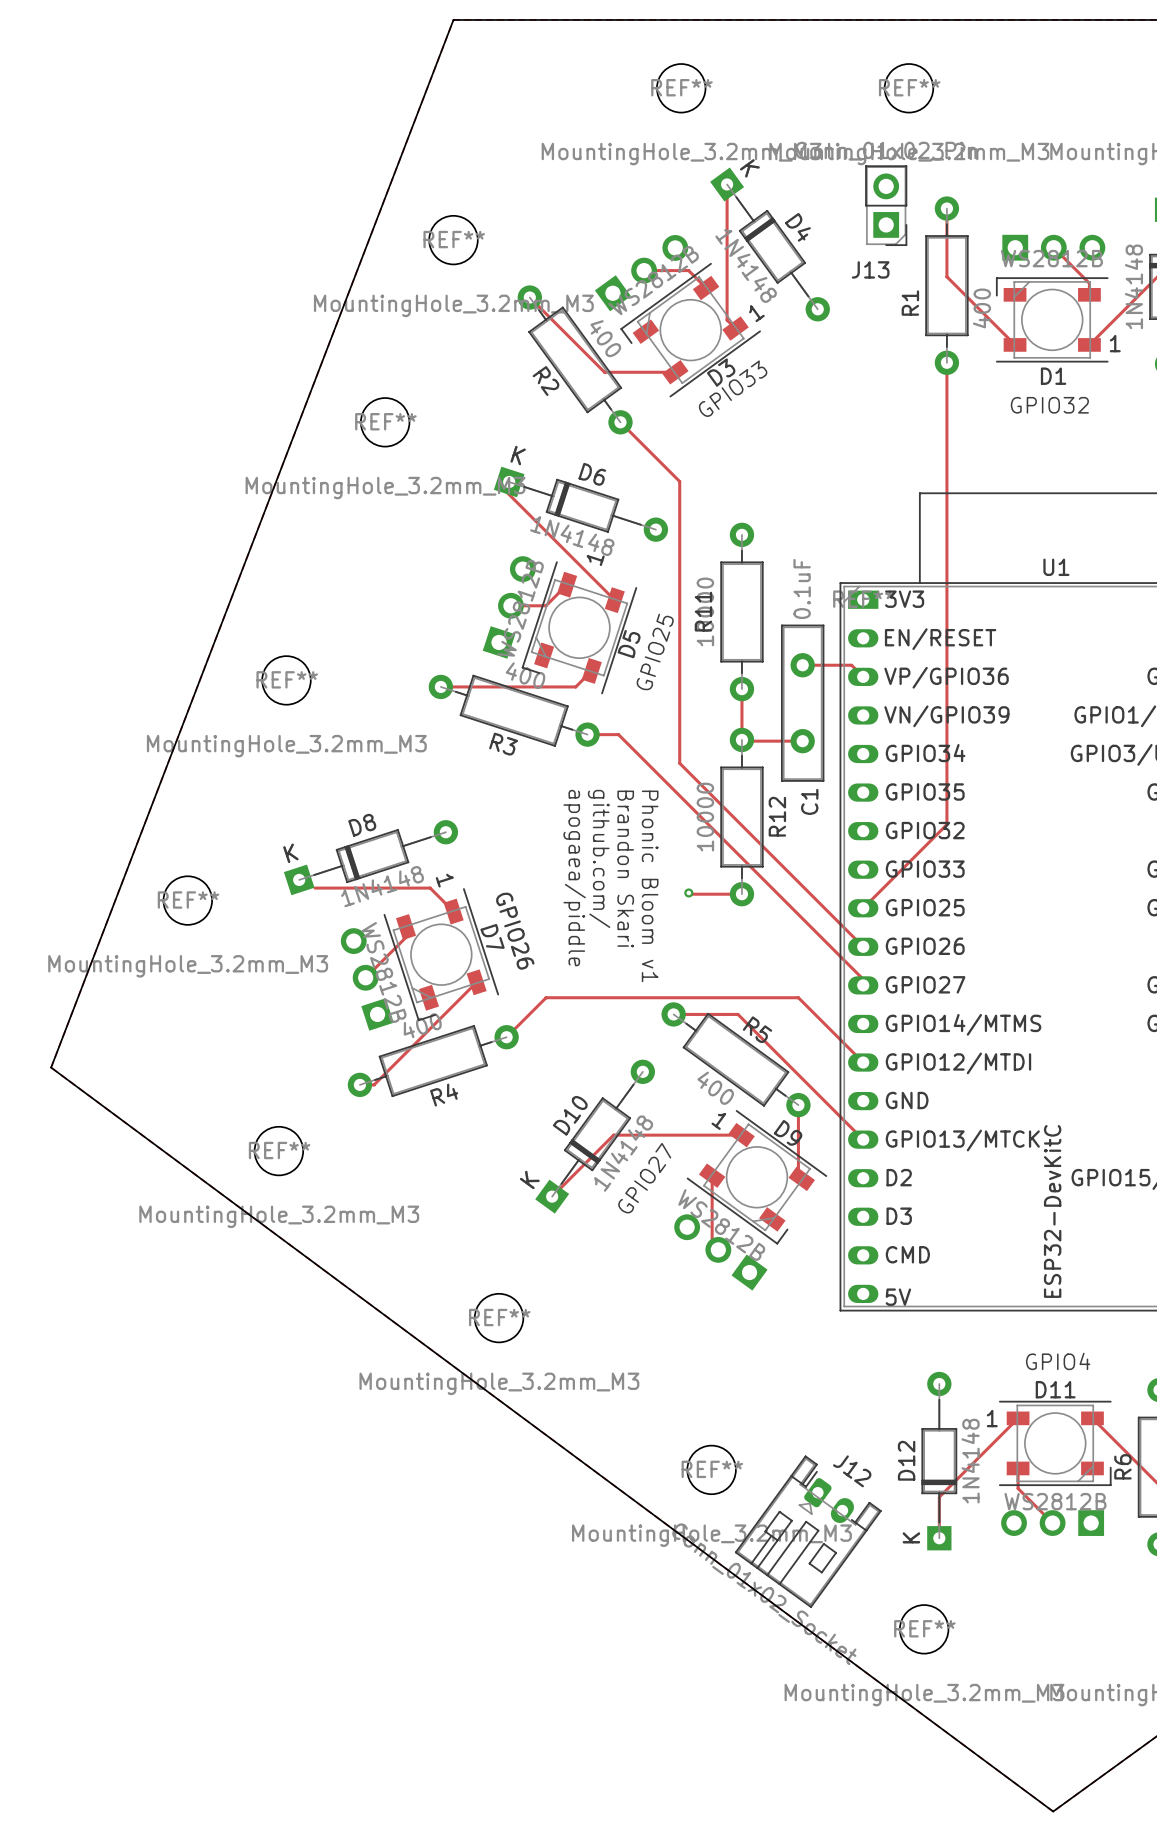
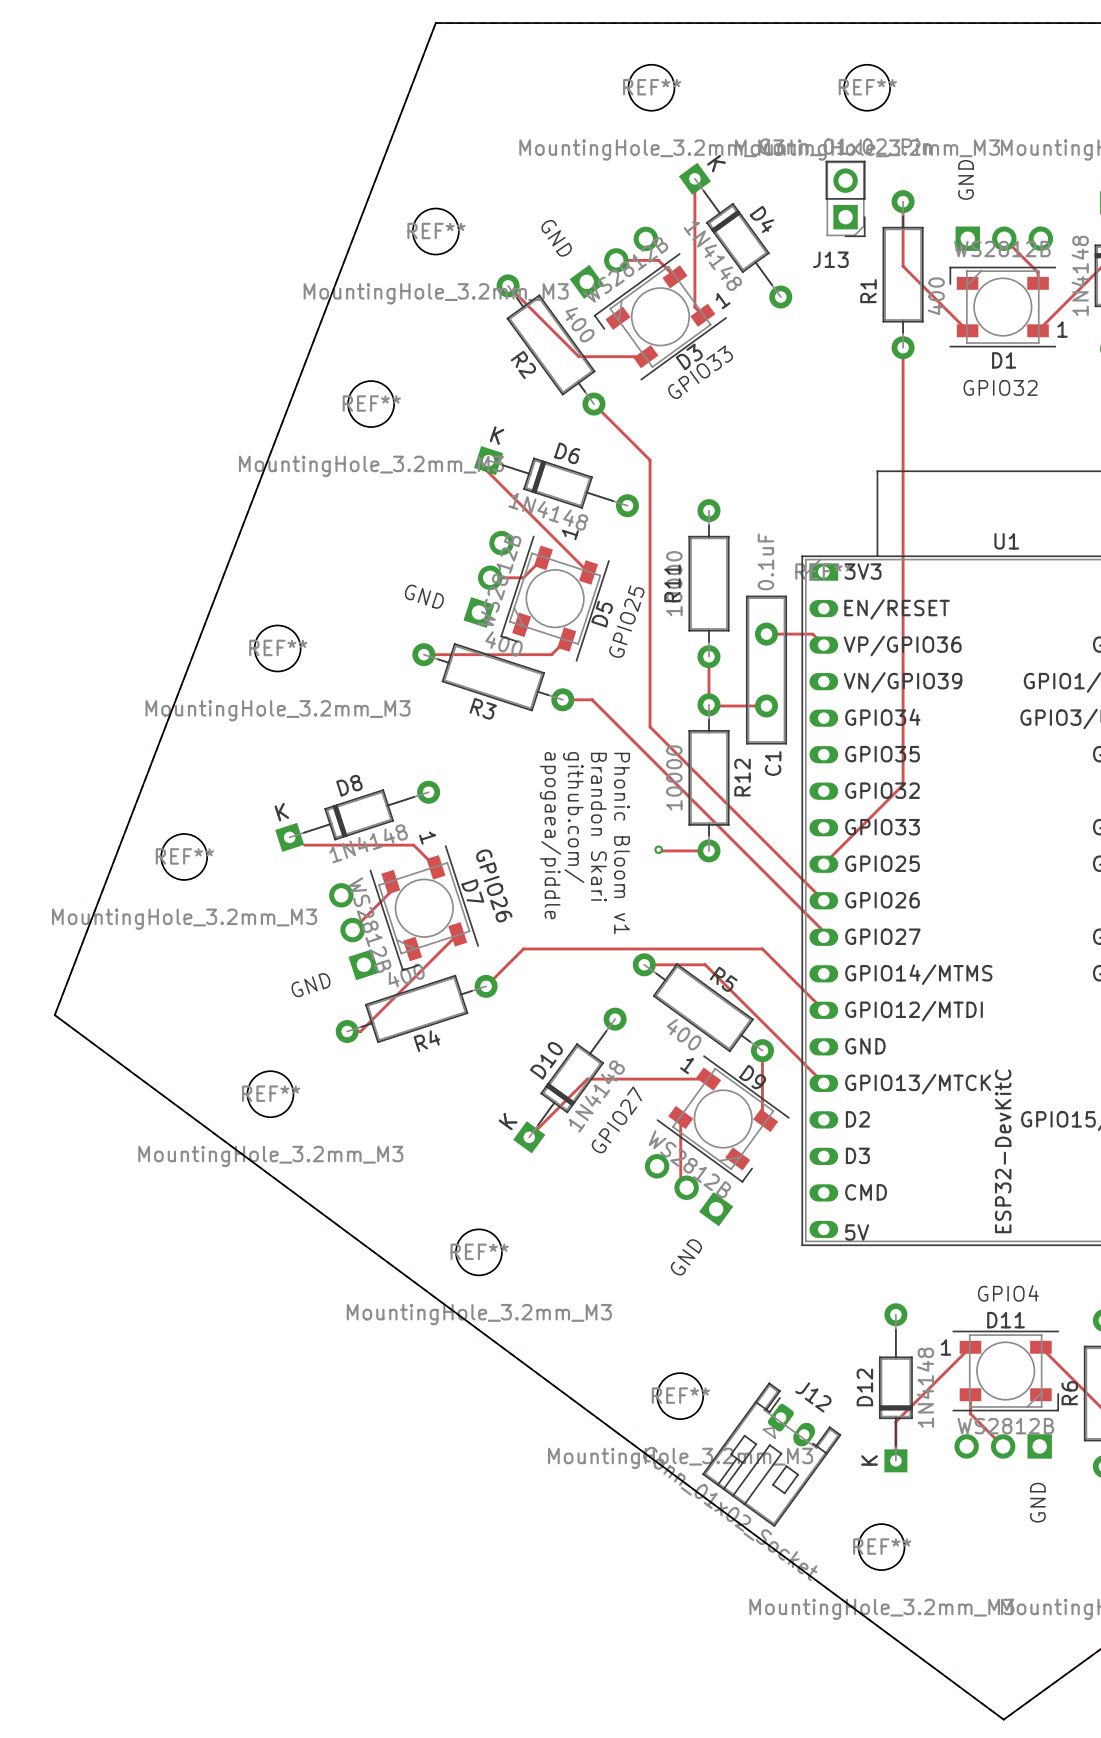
text: none -> GND (966, 179)
text: none -> GND (556, 238)
text: none -> GND (424, 596)
text: none -> GND (311, 985)
text: none -> GND (686, 1257)
text: none -> GND (1037, 1502)

